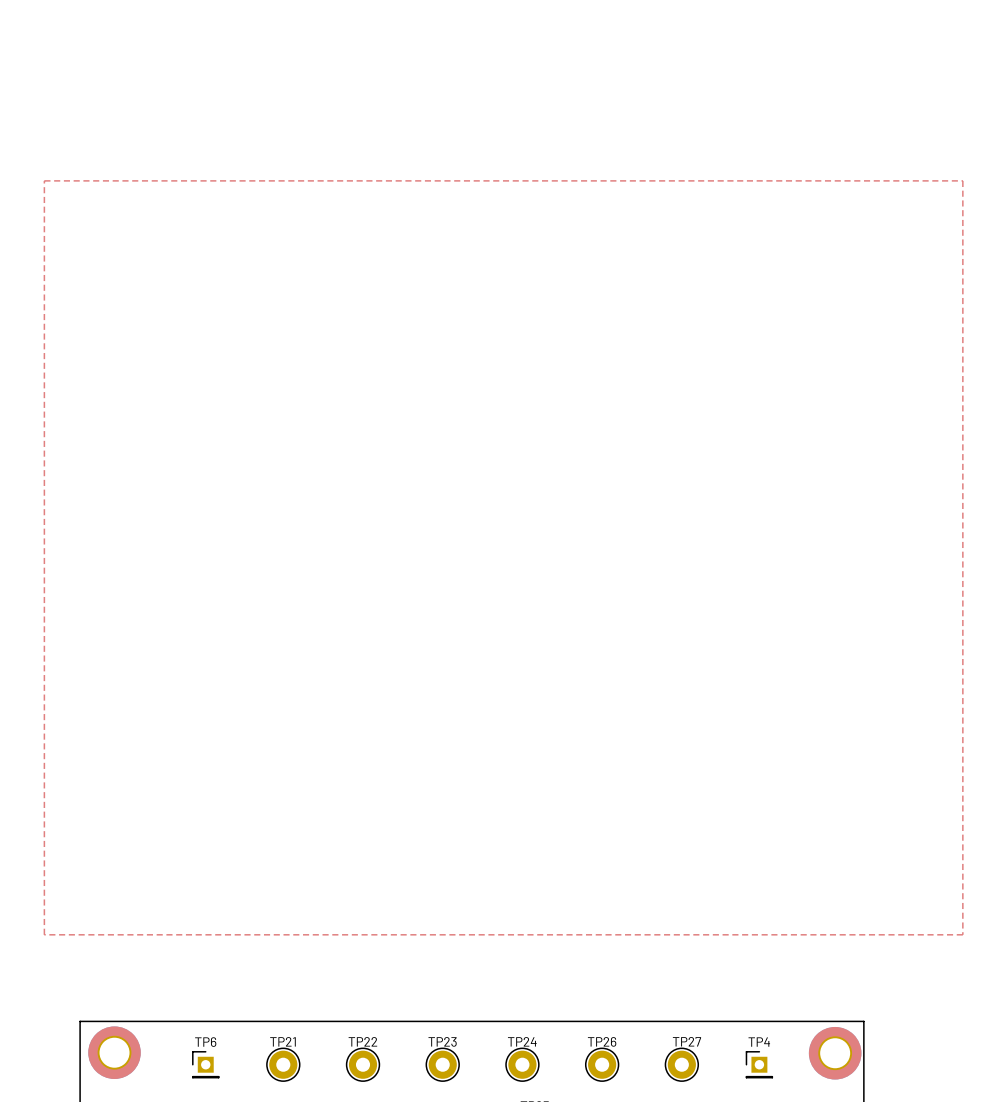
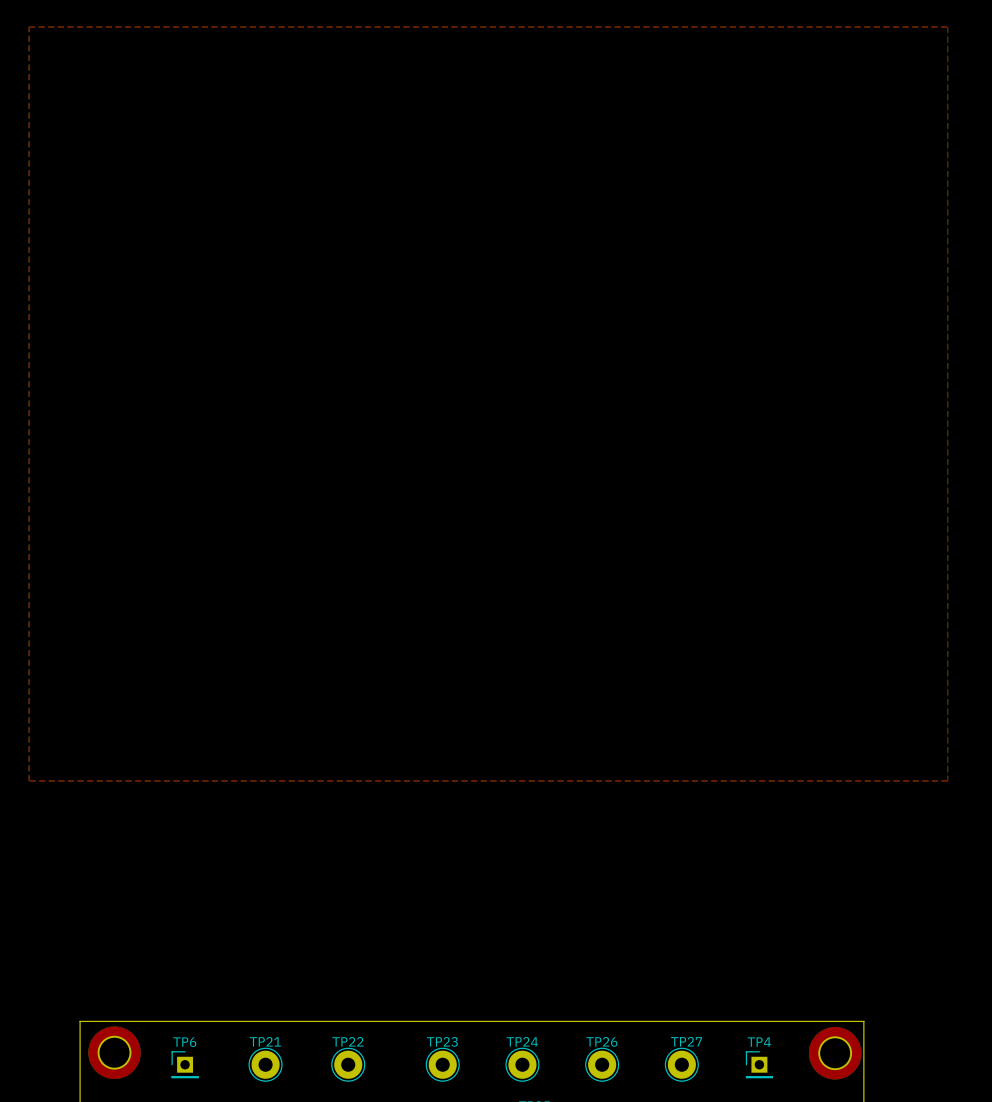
top zone outline: (44, 180) (962, 180) (962, 934) (44, 934) (44, 180) -> (29, 27) (947, 27) (947, 780) (29, 780) (29, 27)
TP6 position: (205, 1064) -> (185, 1064)
TP21 position: (283, 1064) -> (265, 1064)
TP22 position: (363, 1064) -> (348, 1064)

